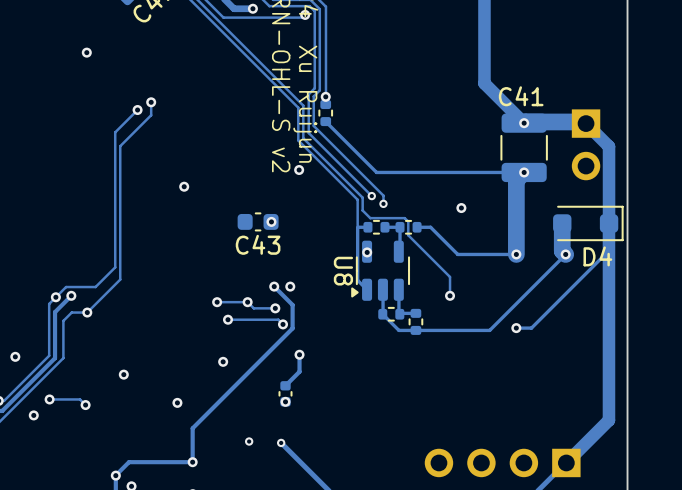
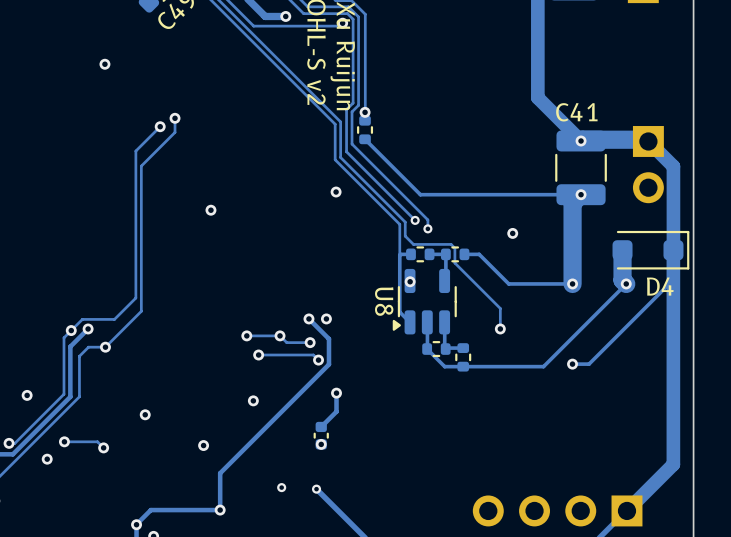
C43: (258, 221) -> none
via: (271, 221) -> none

